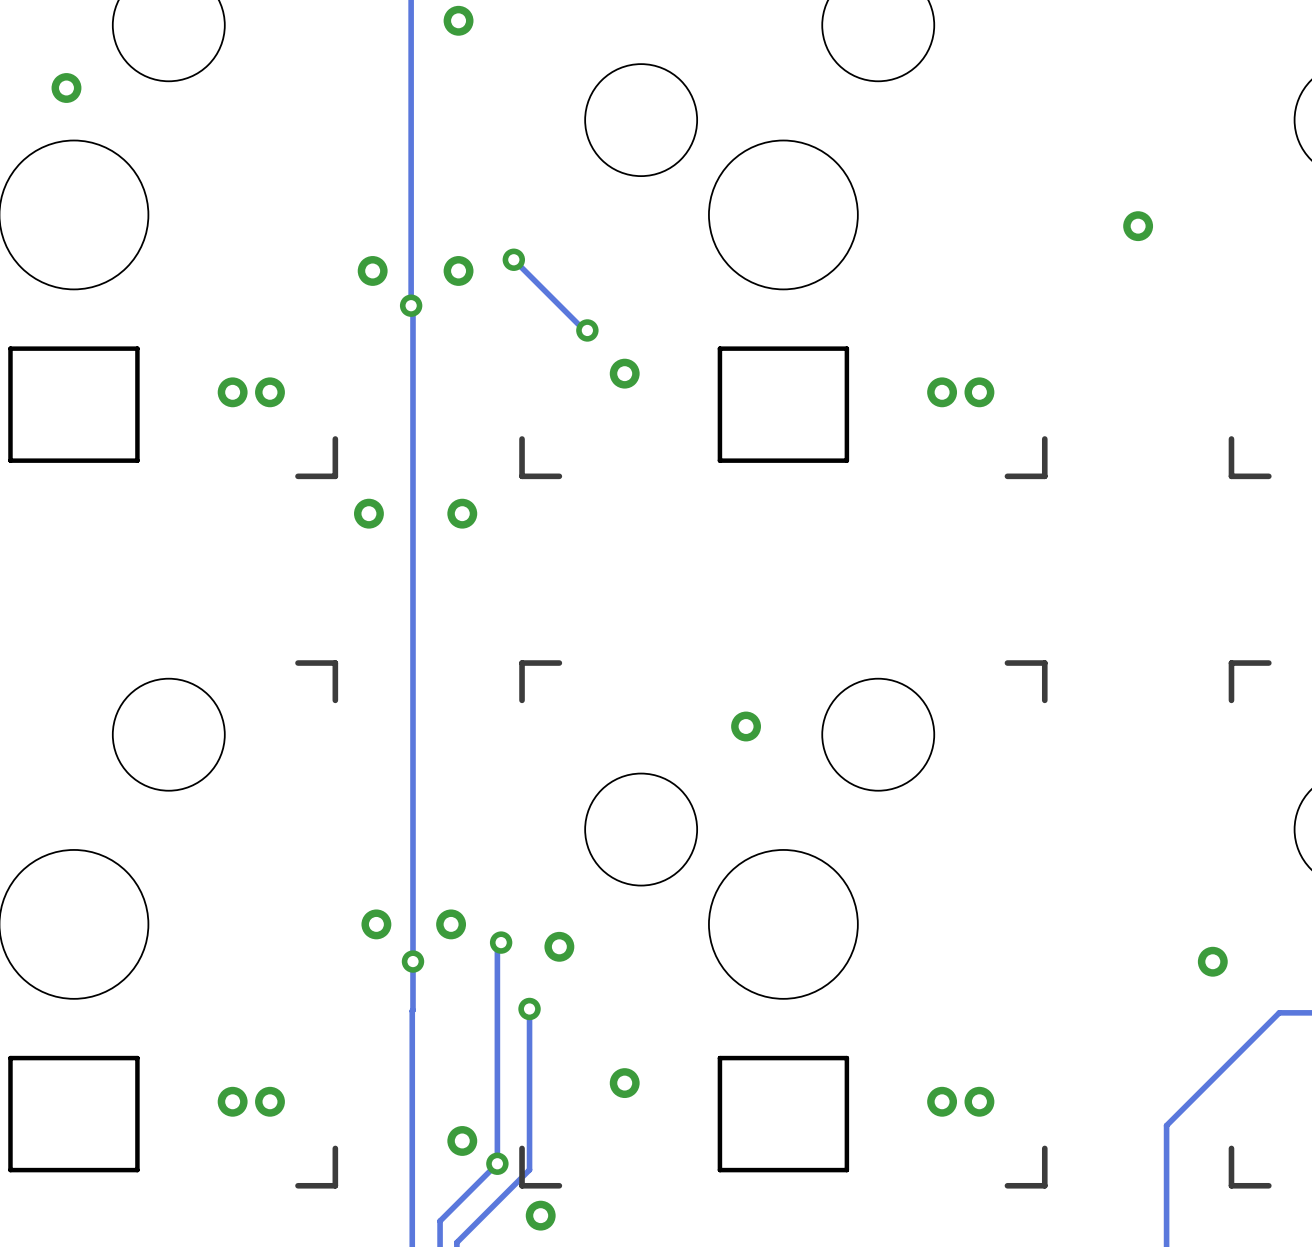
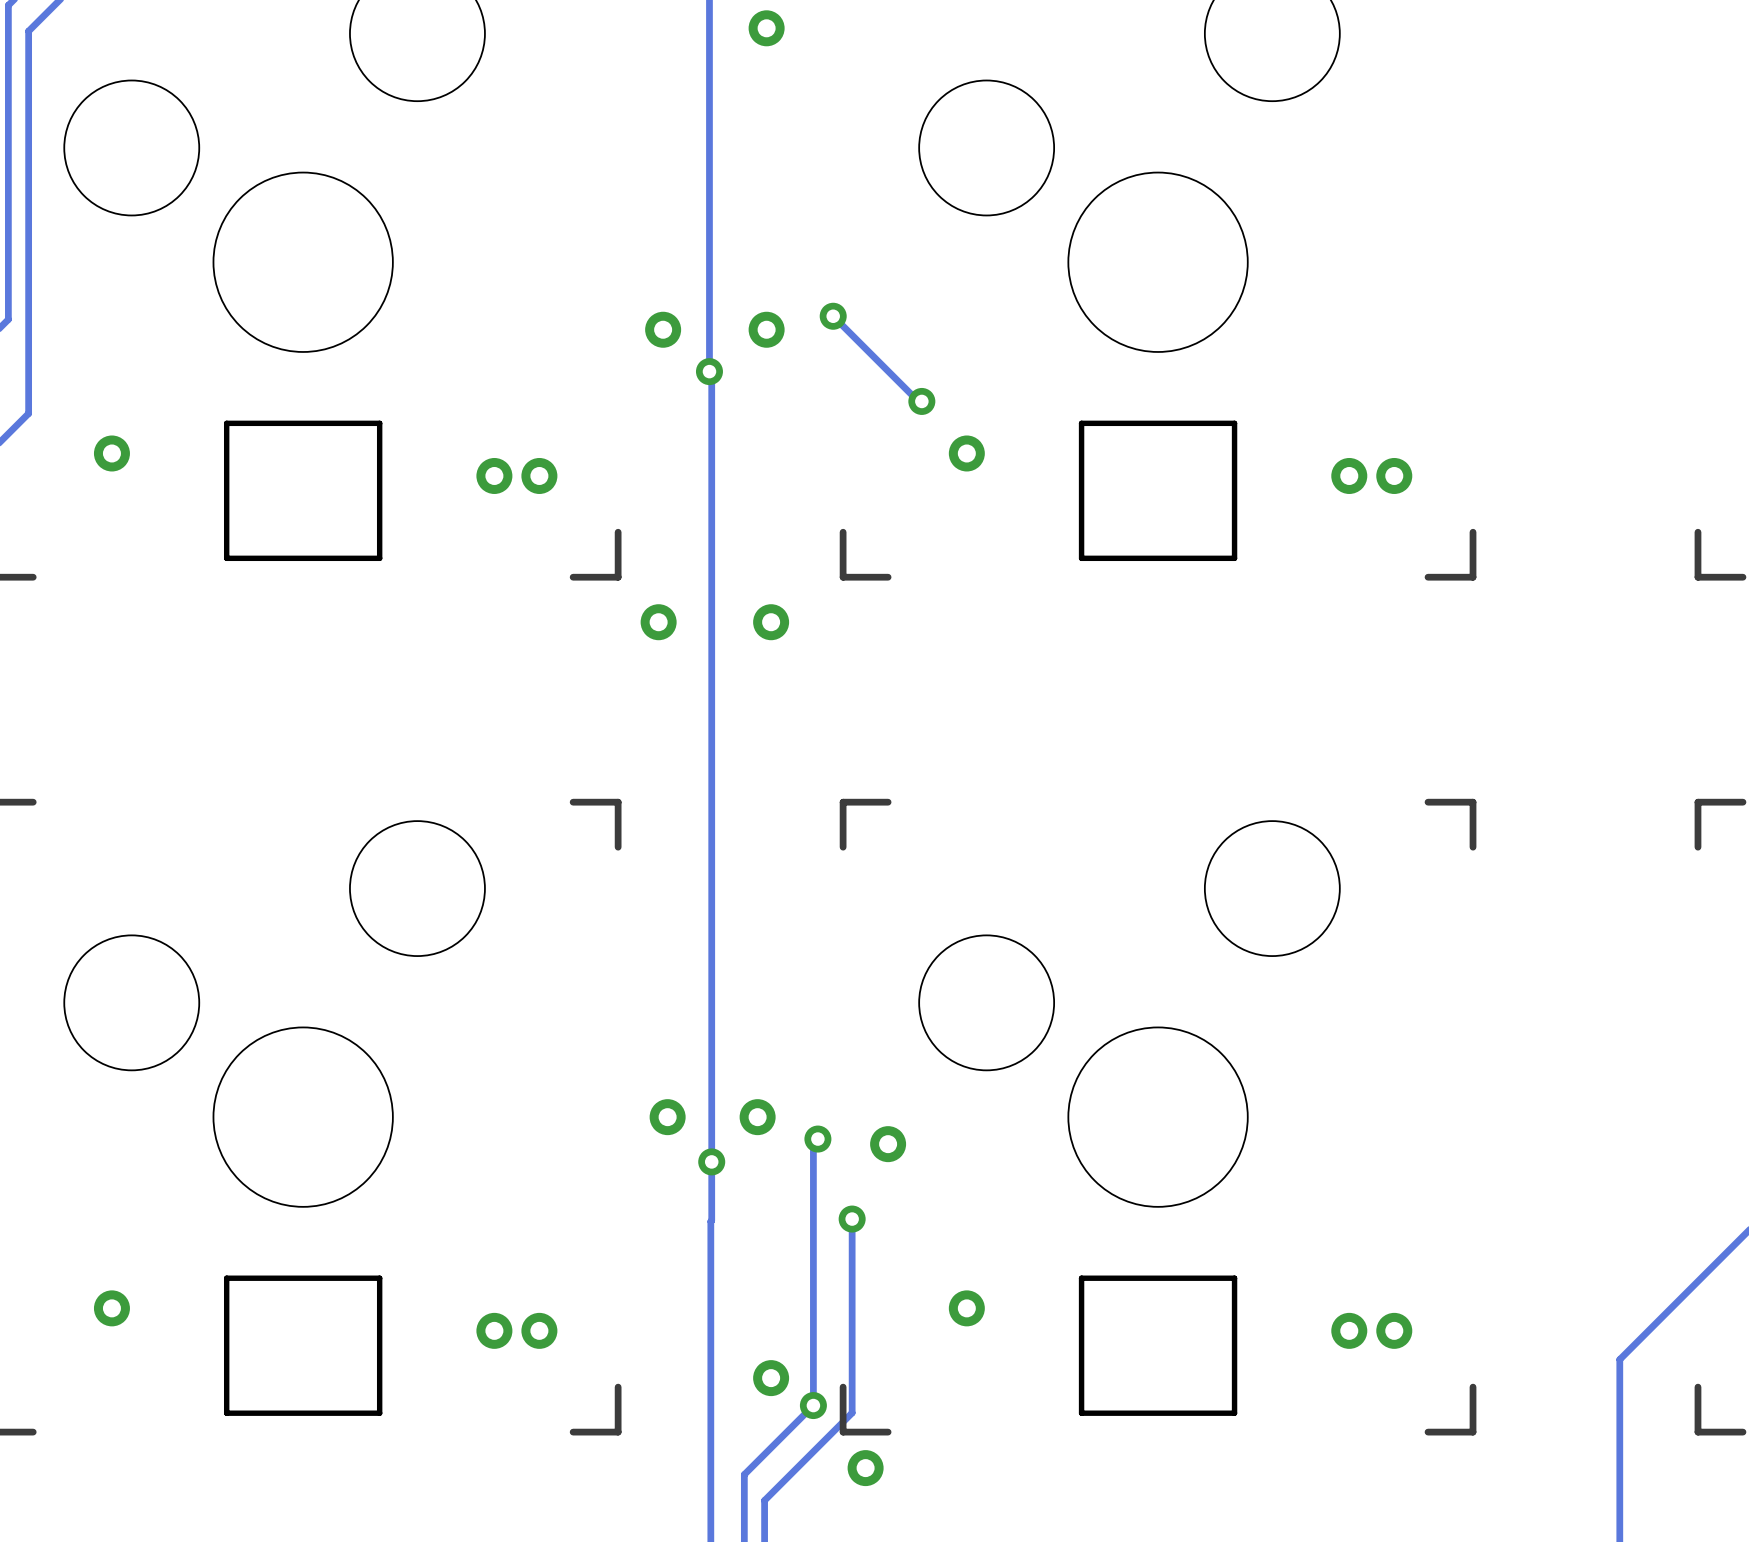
via: (66, 88) -> none
via: (1138, 226) -> none
via: (746, 726) -> none
via: (1212, 961) -> none

